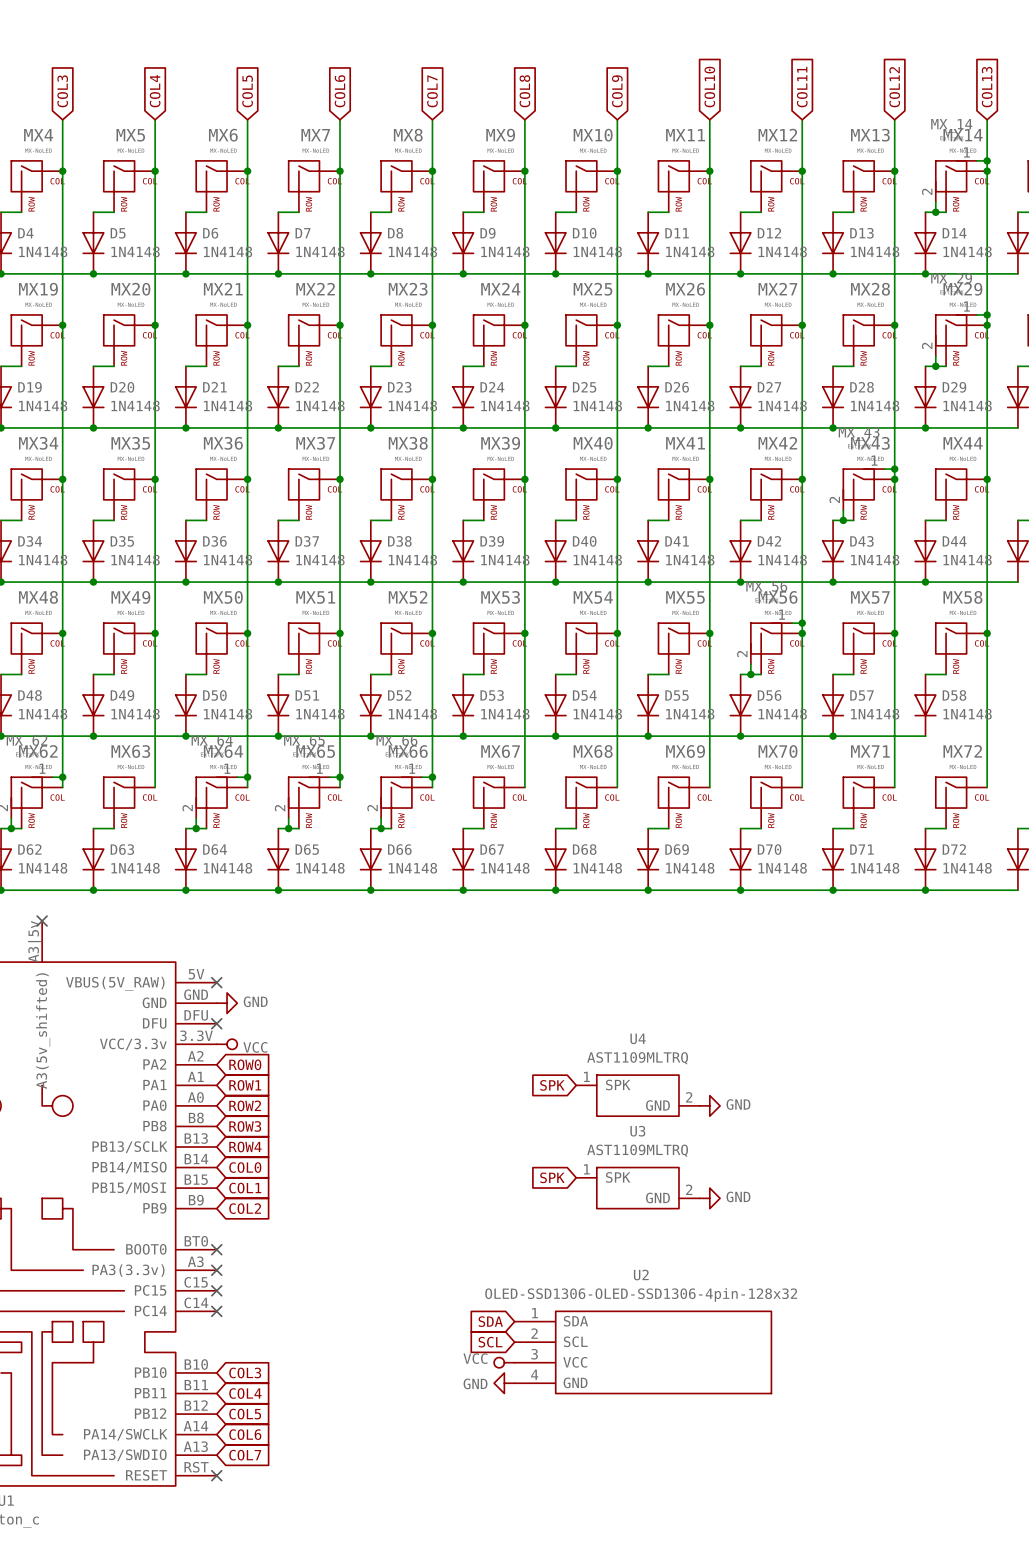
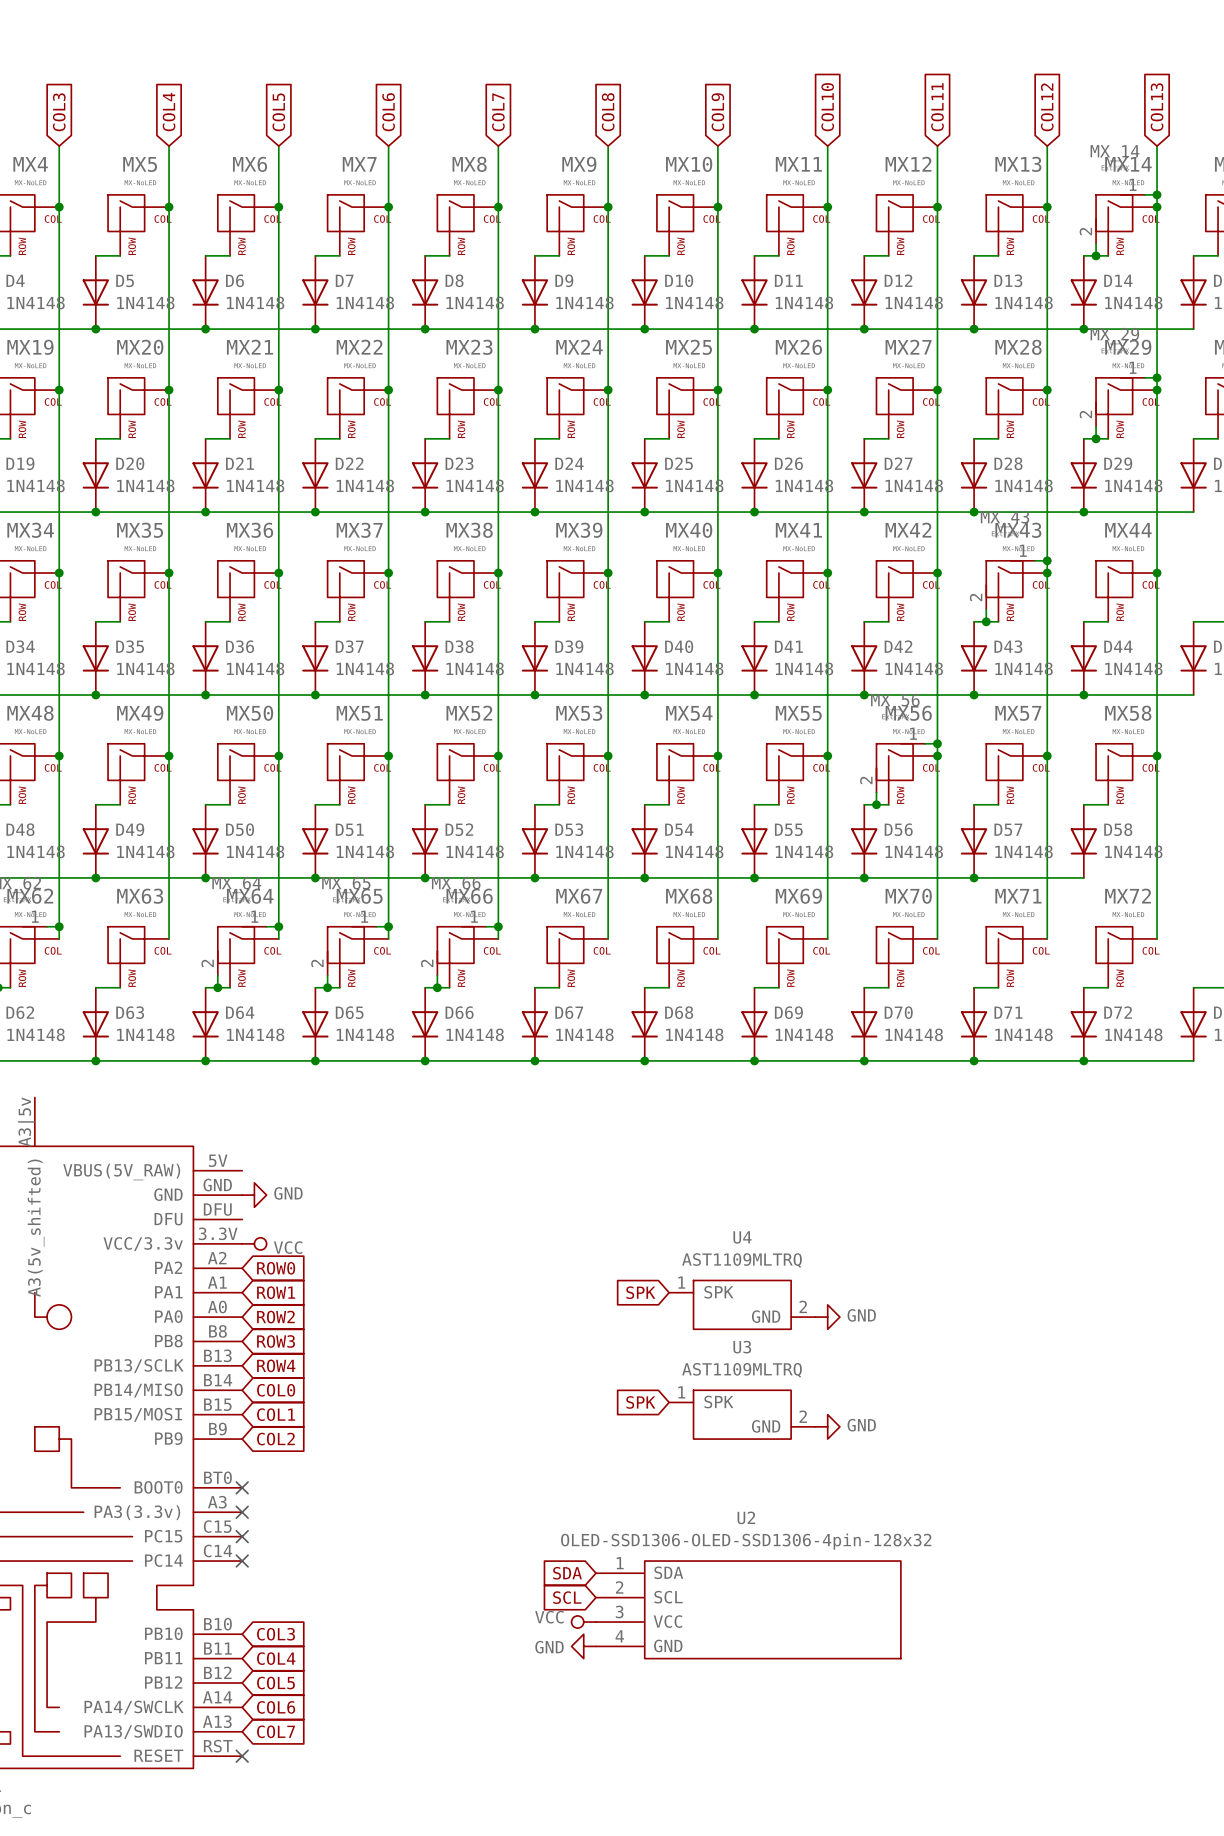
no-connect mark: (42, 921) -> none
no-connect mark: (216, 982) -> none
no-connect mark: (216, 1023) -> none

